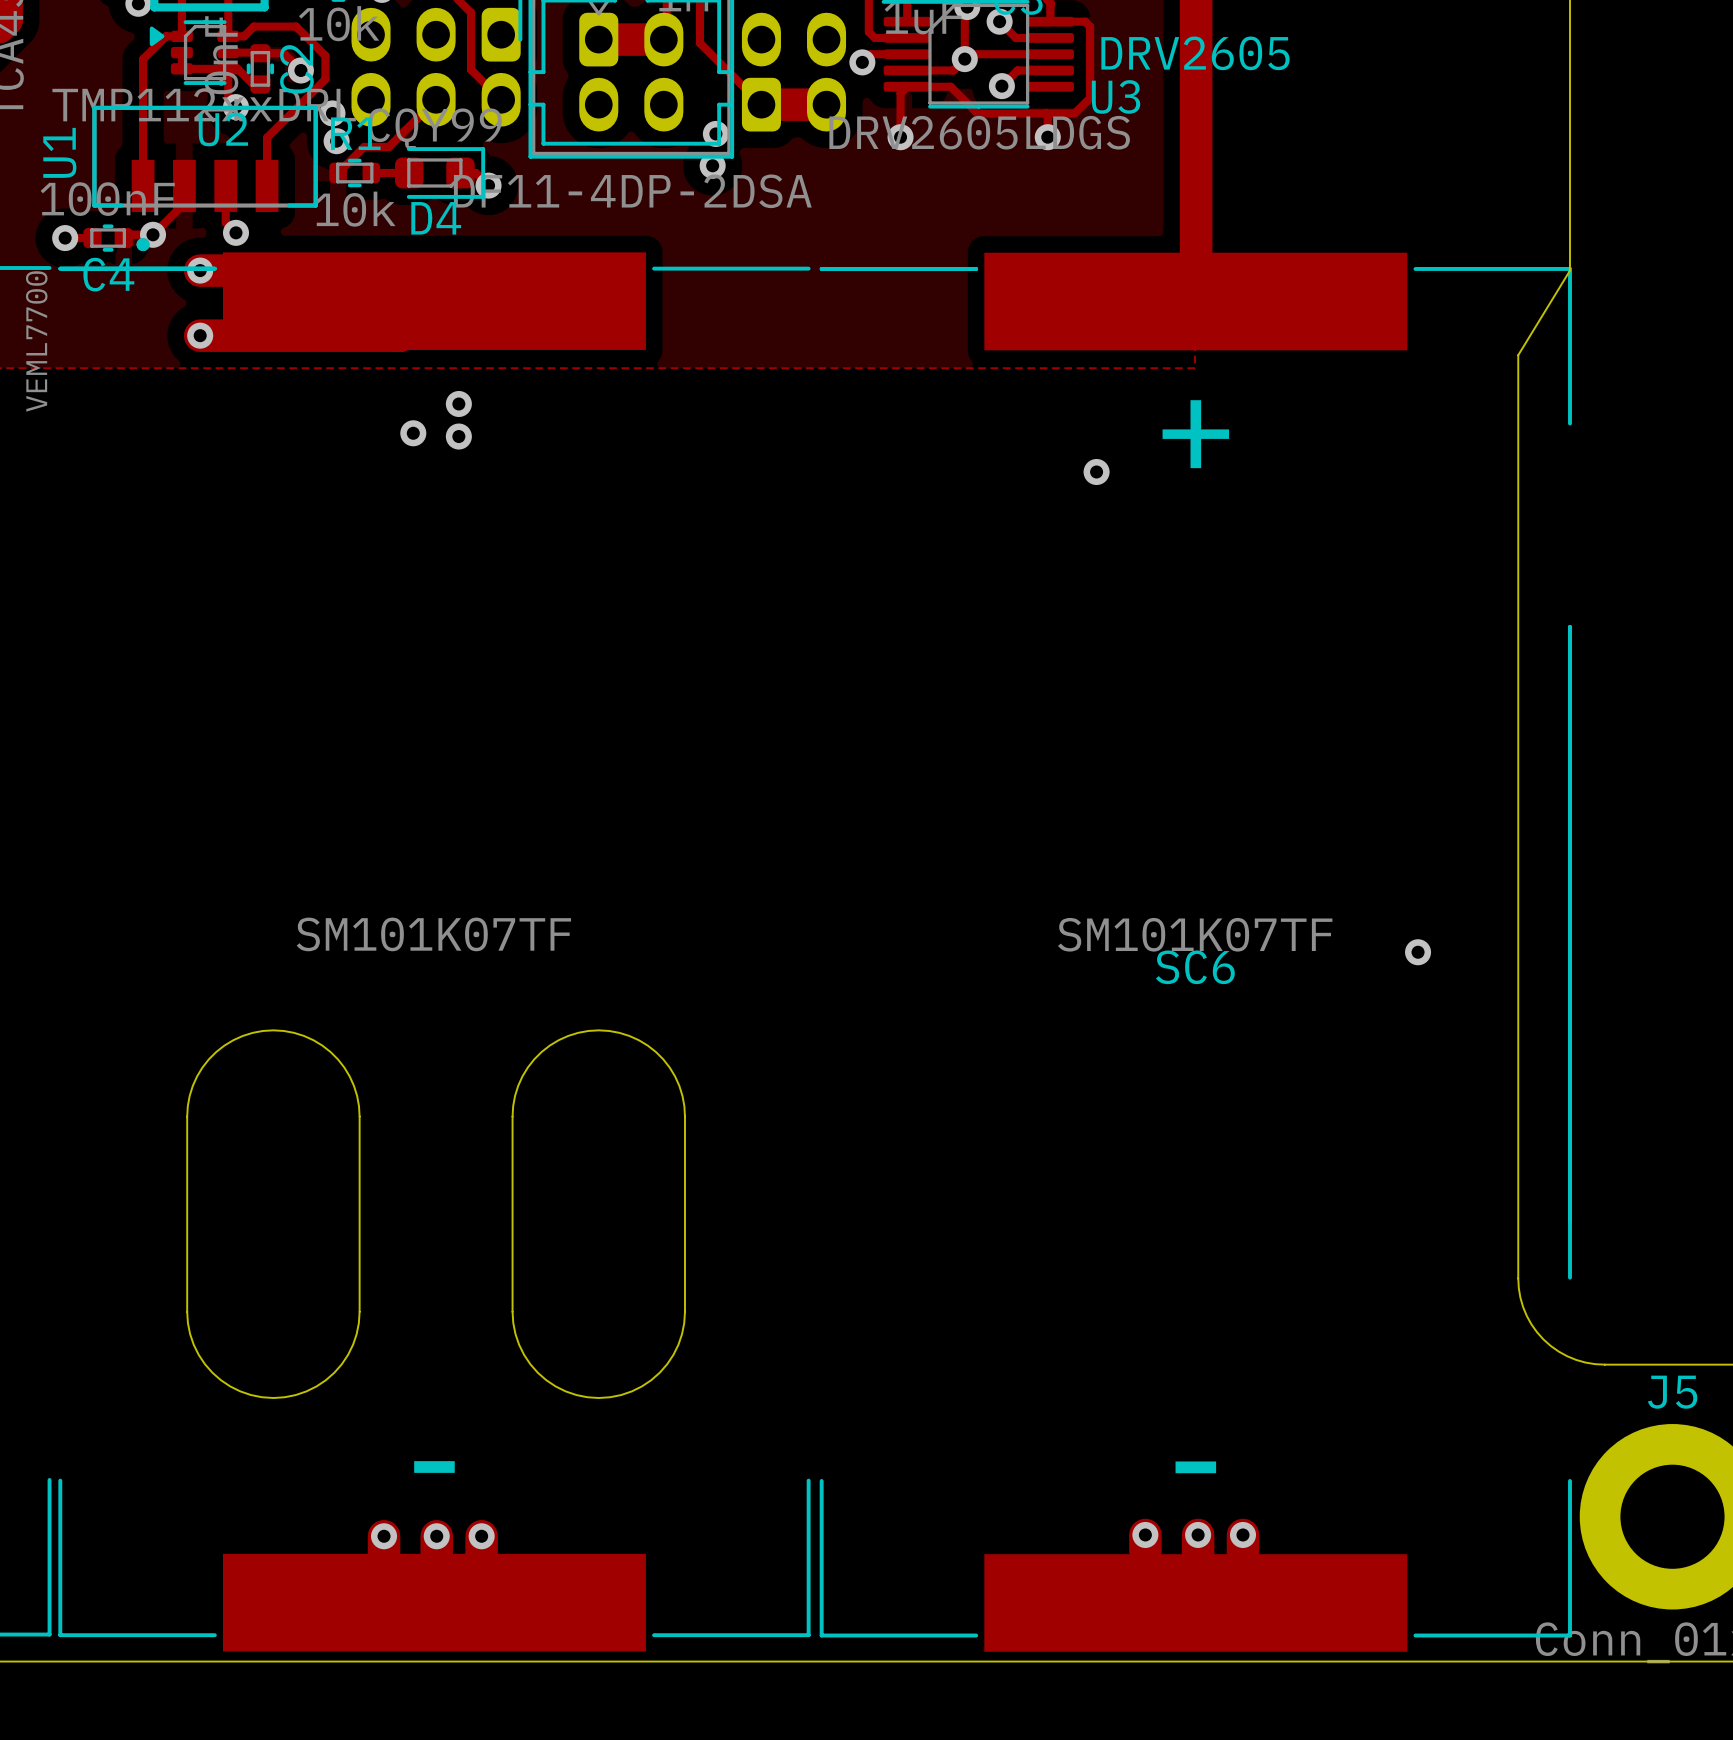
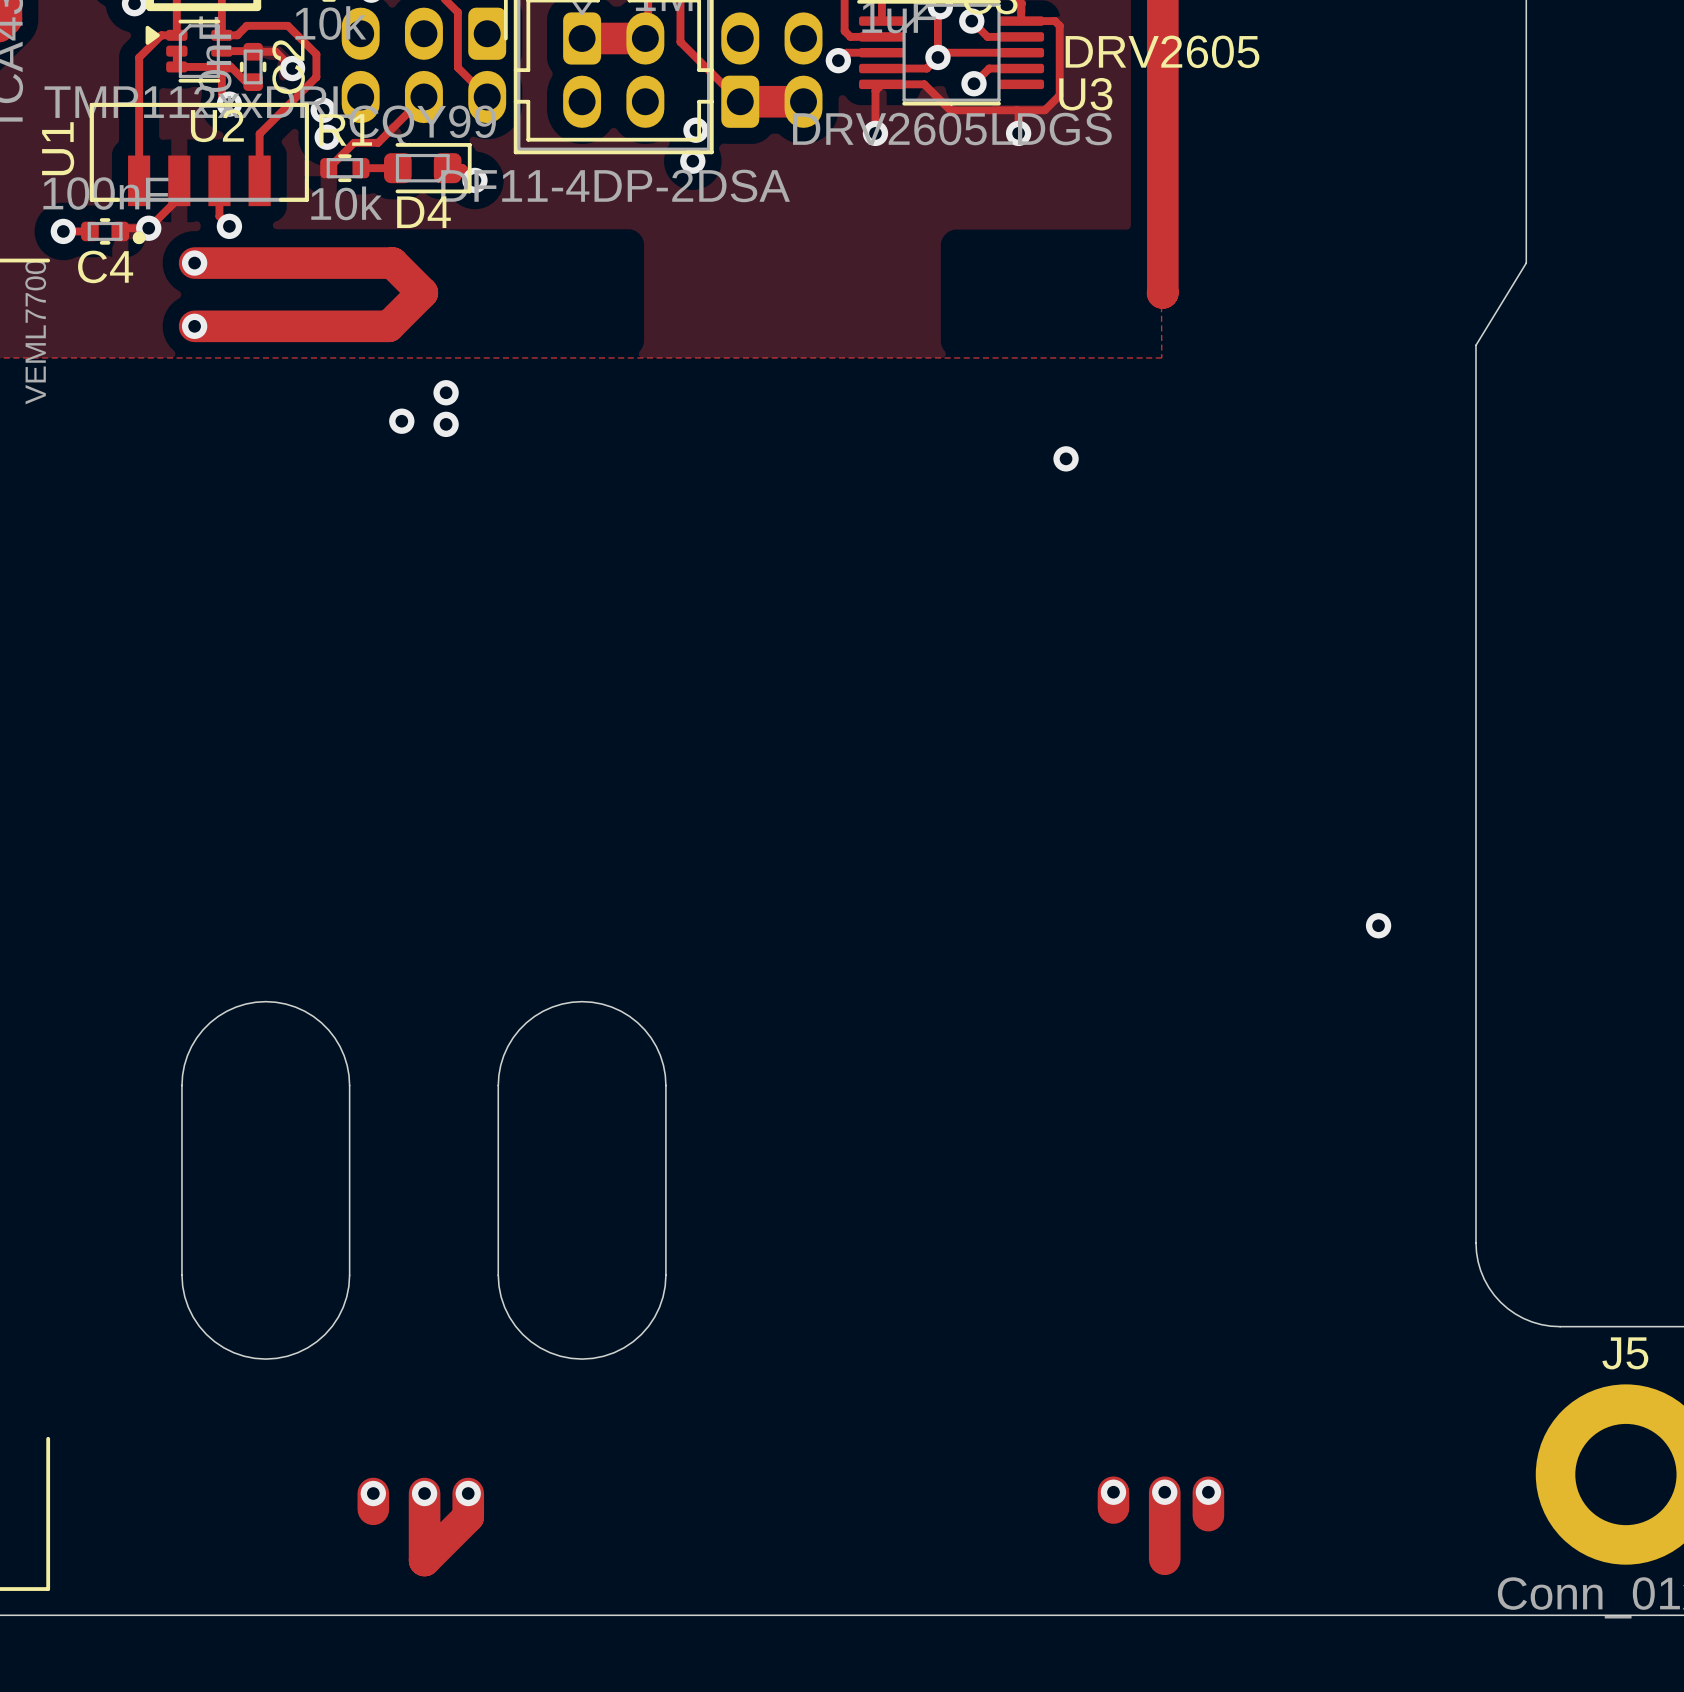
part: SM101K07TF (434, 951) -> none
SC6: SM101K07TF (1195, 952) -> none

